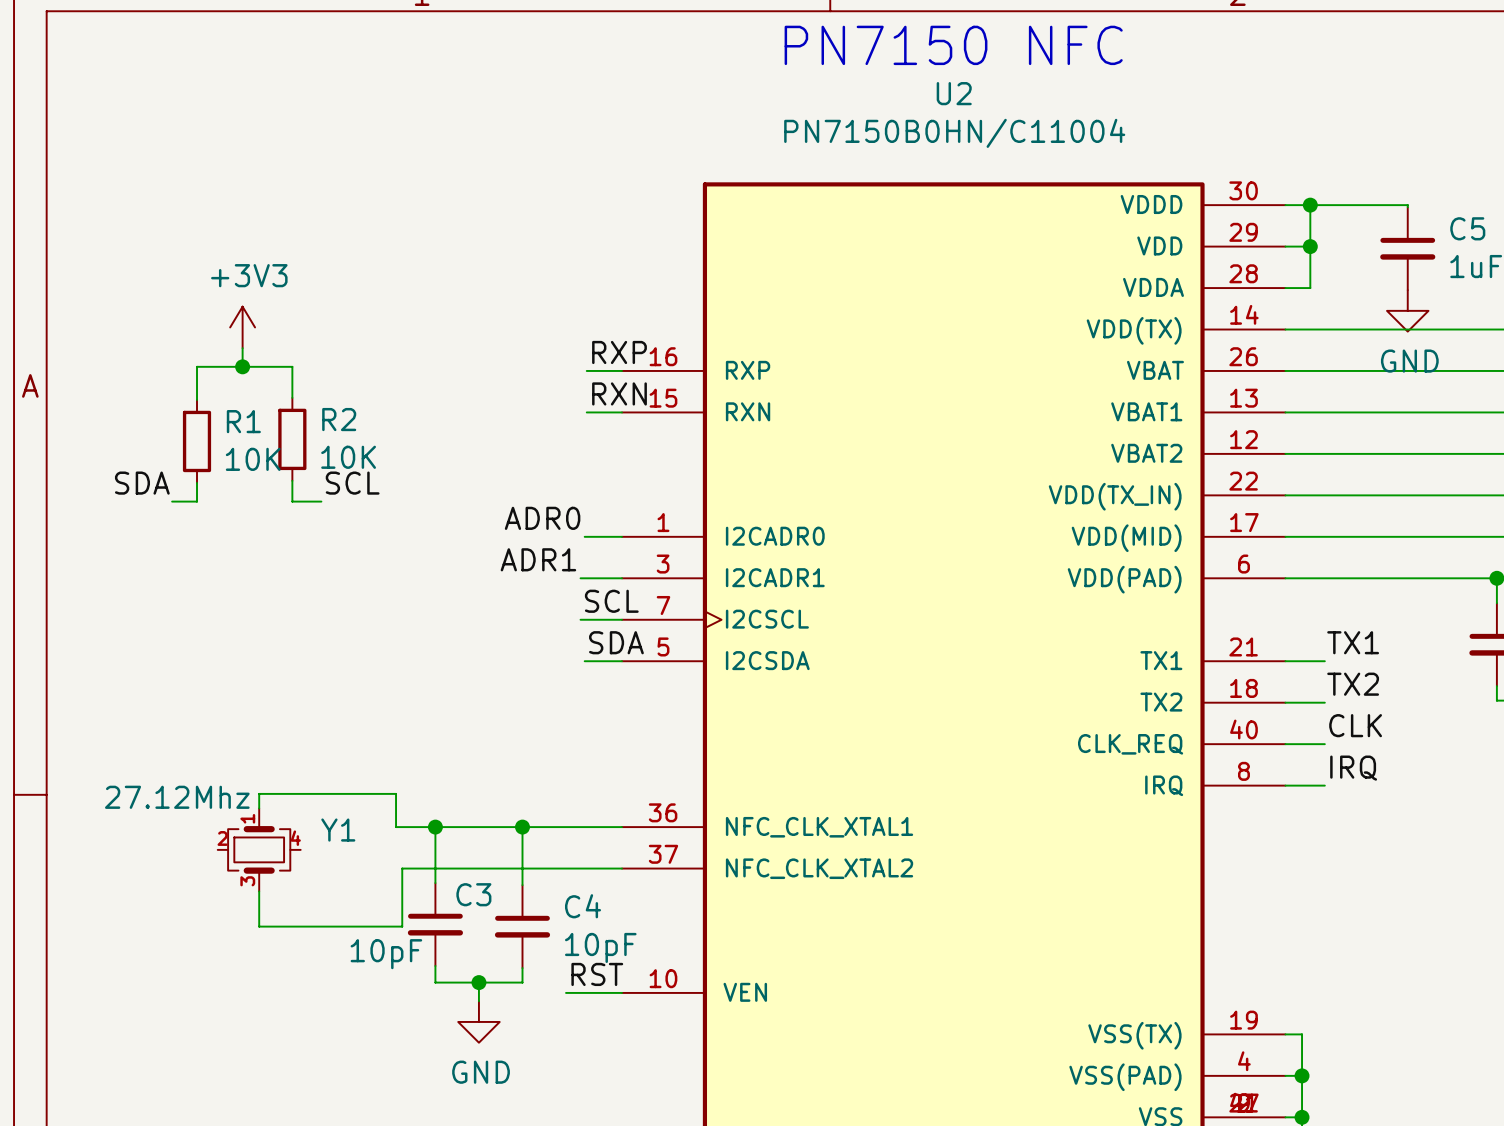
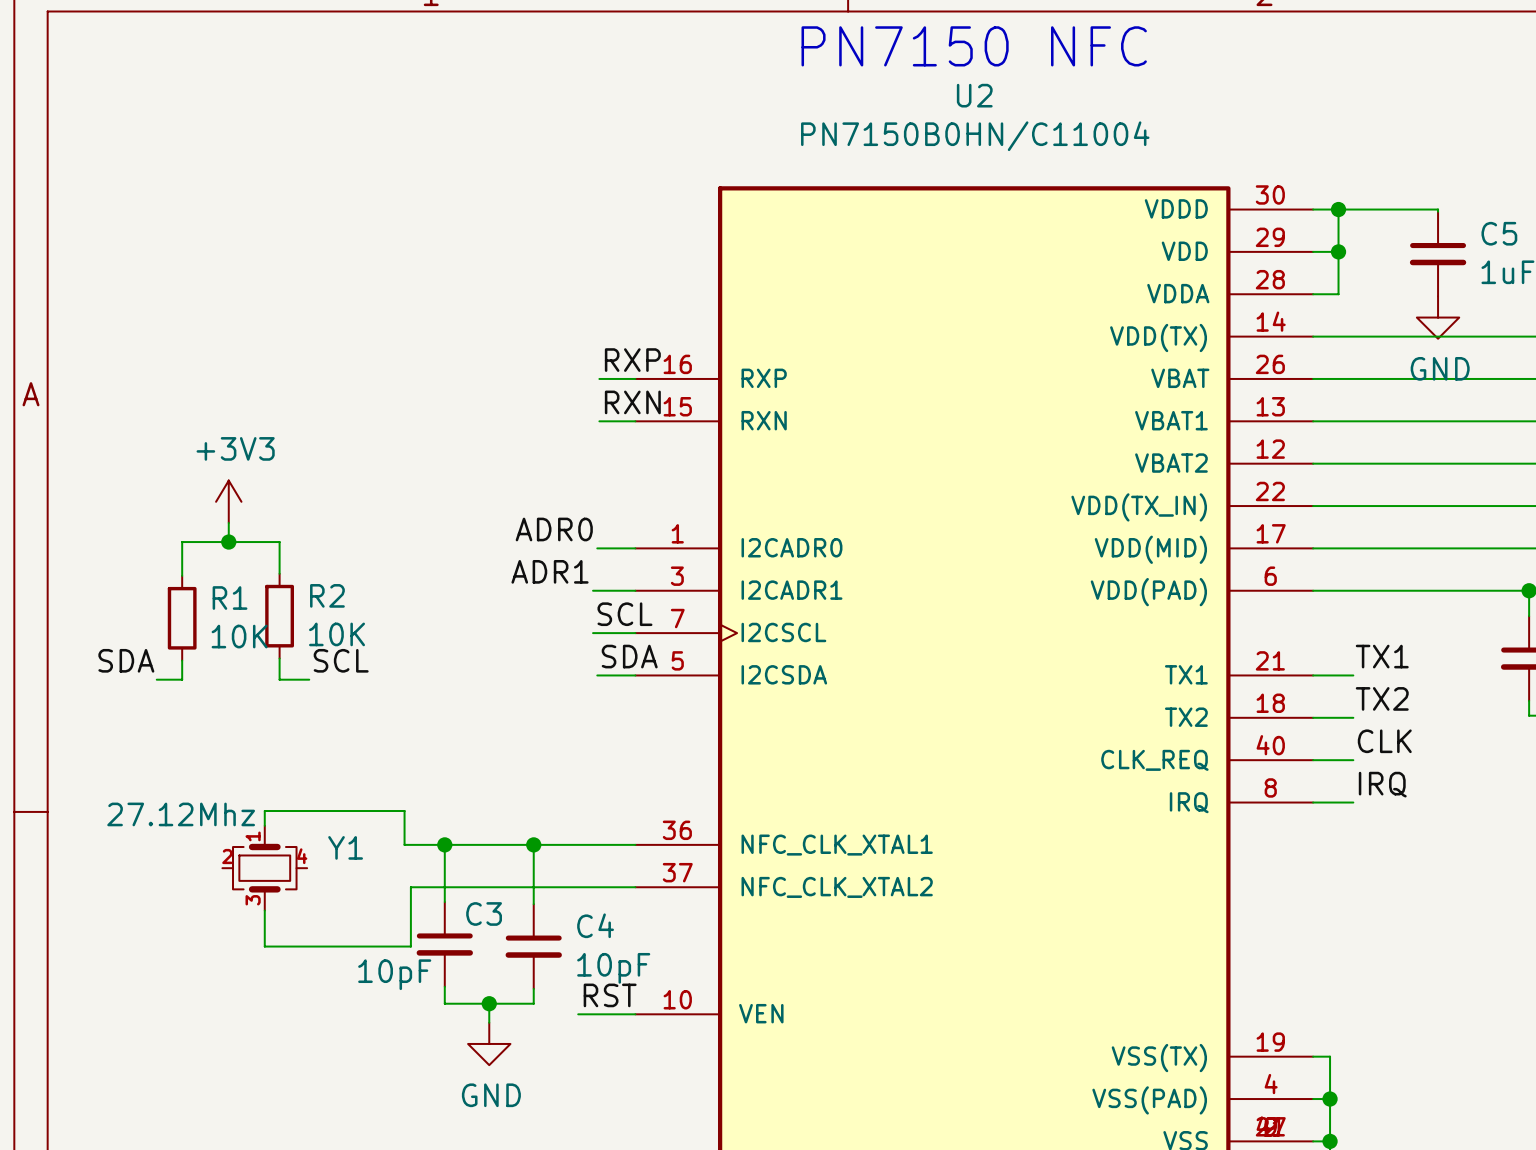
power symbol position: +3V3 (242, 327) -> +3V3 (228, 501)
wire: (242, 348) (242, 366) -> (228, 522) (228, 542)
junction: (242, 366) -> none
wire: (292, 397) (292, 366) (197, 366) (197, 400) -> (279, 573) (279, 542) (182, 542) (182, 575)
R2 position: (292, 439) -> (279, 616)
R1 position: (197, 441) -> (182, 618)
wire: (292, 480) (292, 501) (321, 501) -> (279, 658) (279, 679) (309, 679)
wire: (197, 482) (197, 501) (172, 501) -> (182, 660) (182, 679) (156, 679)
label position: SDA (142, 483) -> SDA (126, 660)
label position: SCL (352, 483) -> SCL (341, 660)
junction: none -> (228, 542)

